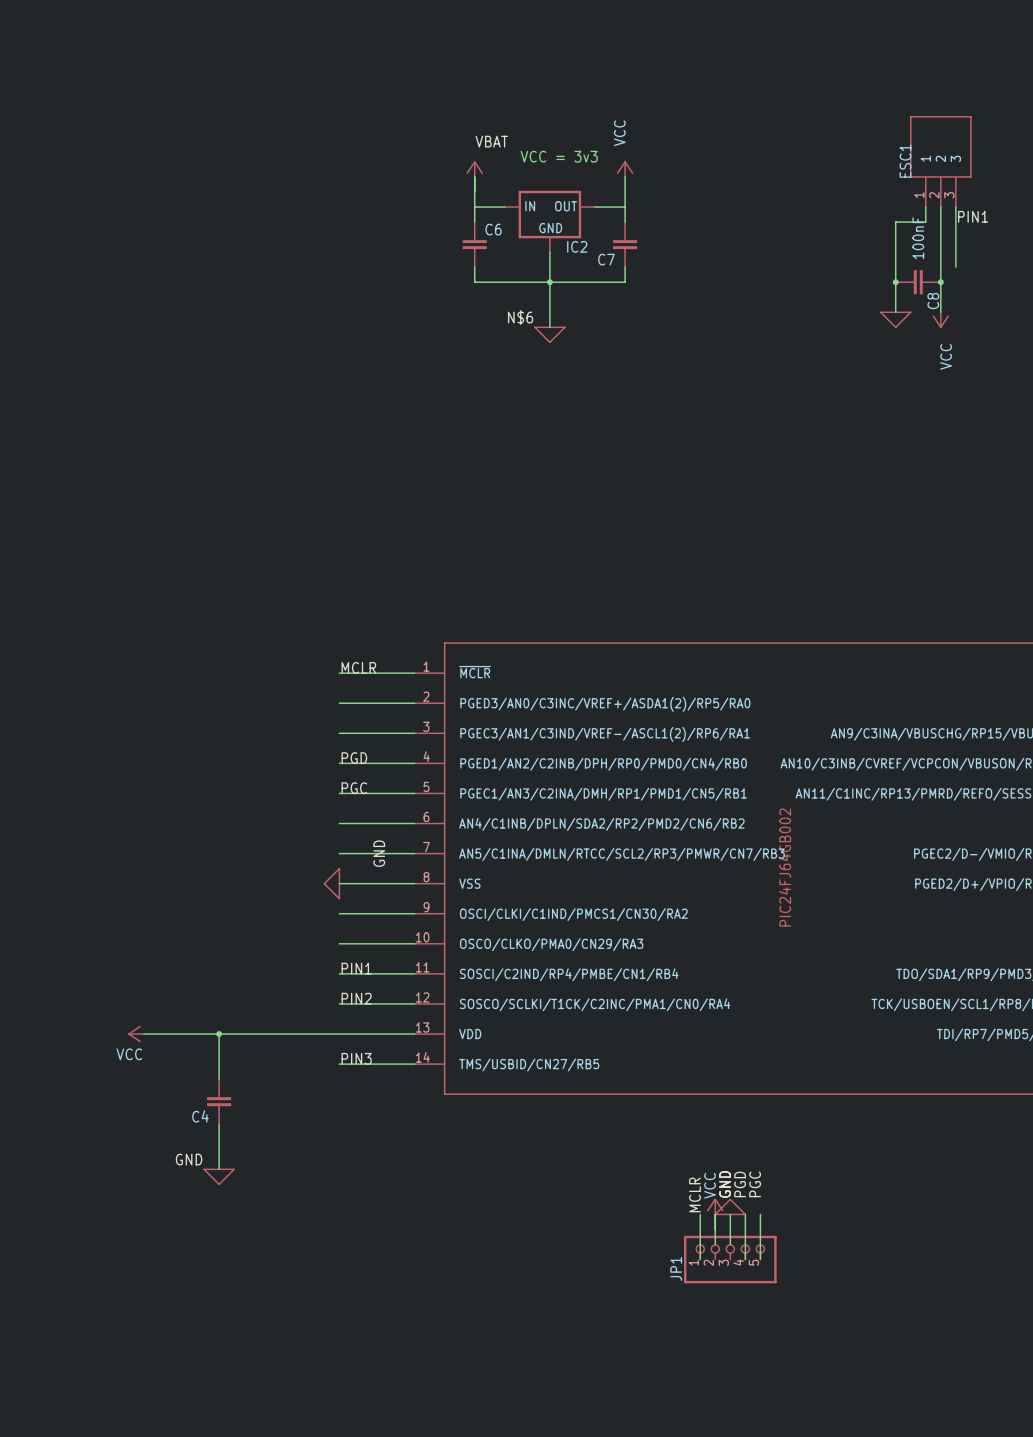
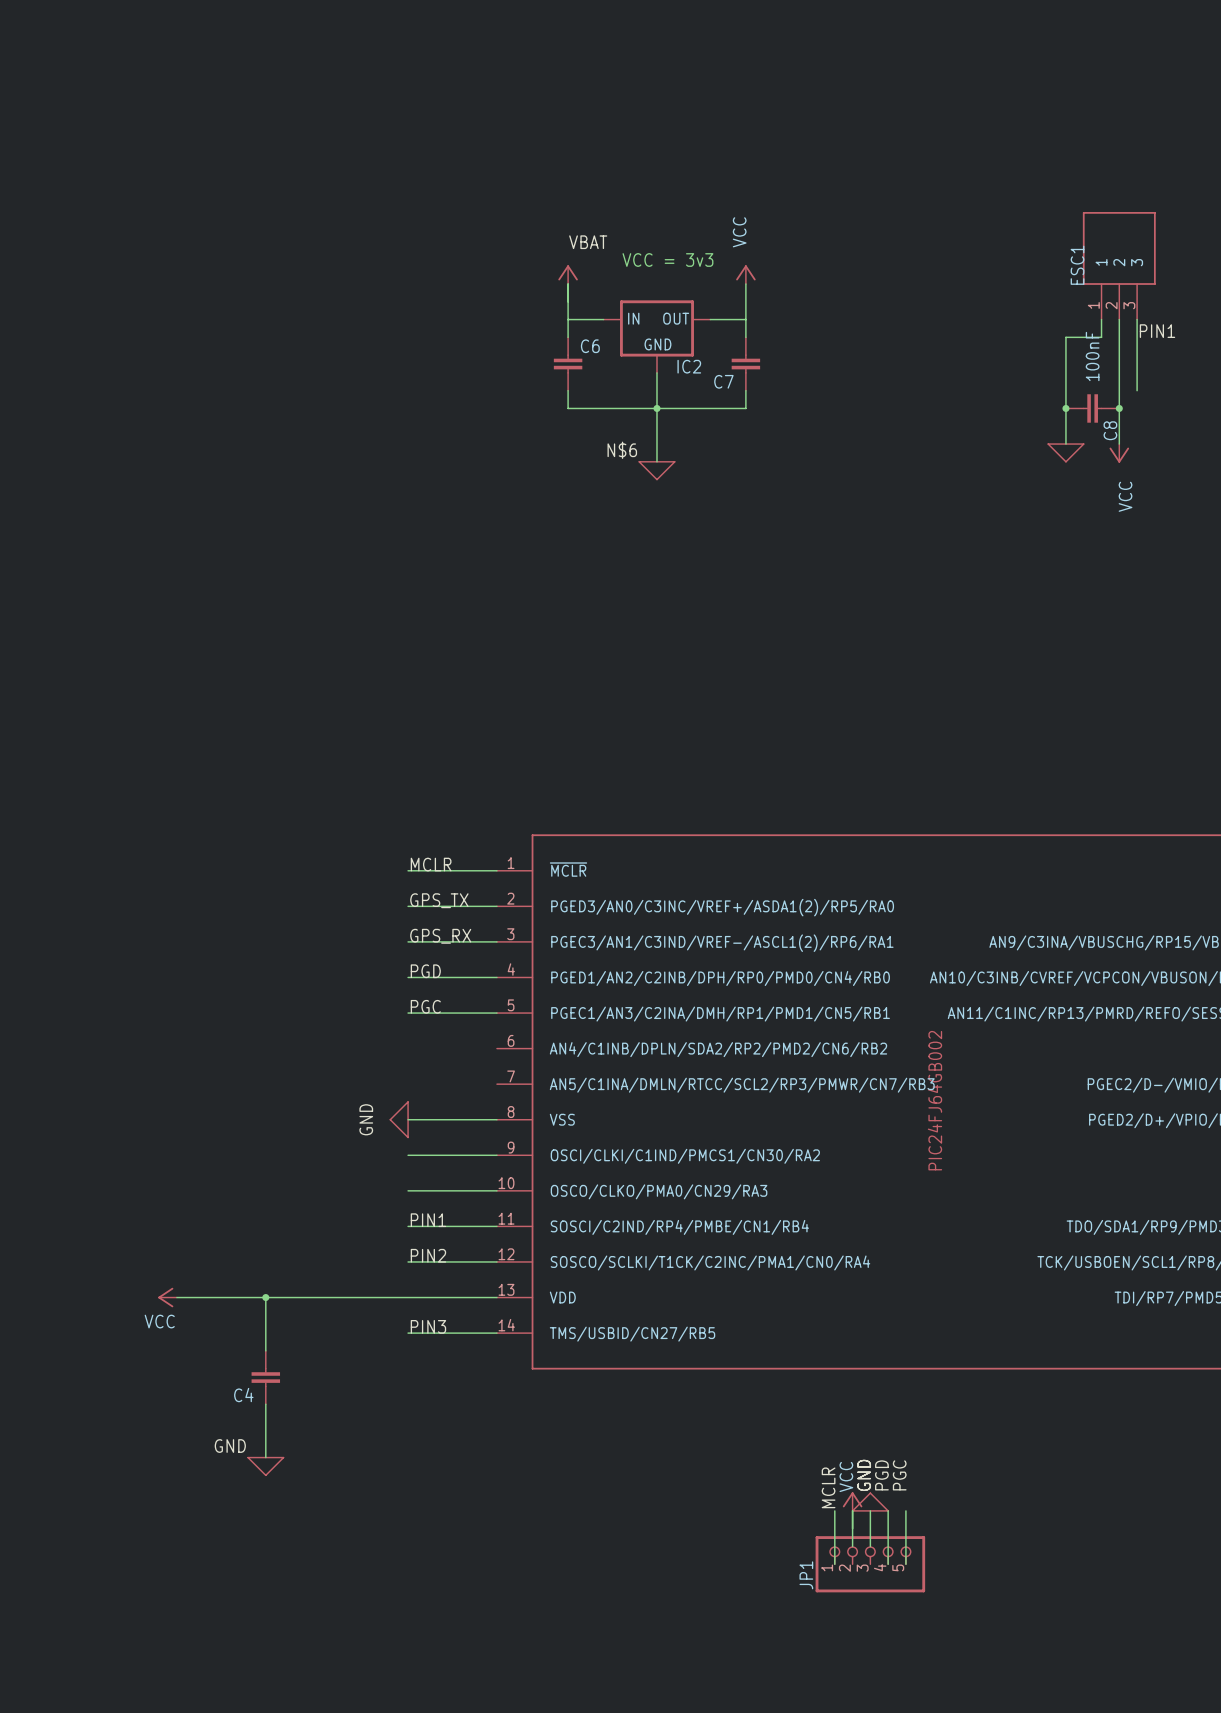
label: none -> GPS_TX (439, 900)
label: none -> GPS_RX (440, 936)
wire: (339, 823) (414, 823) -> none
wire: (339, 853) (414, 853) -> none
label position: GND (379, 853) -> GND (366, 1119)

